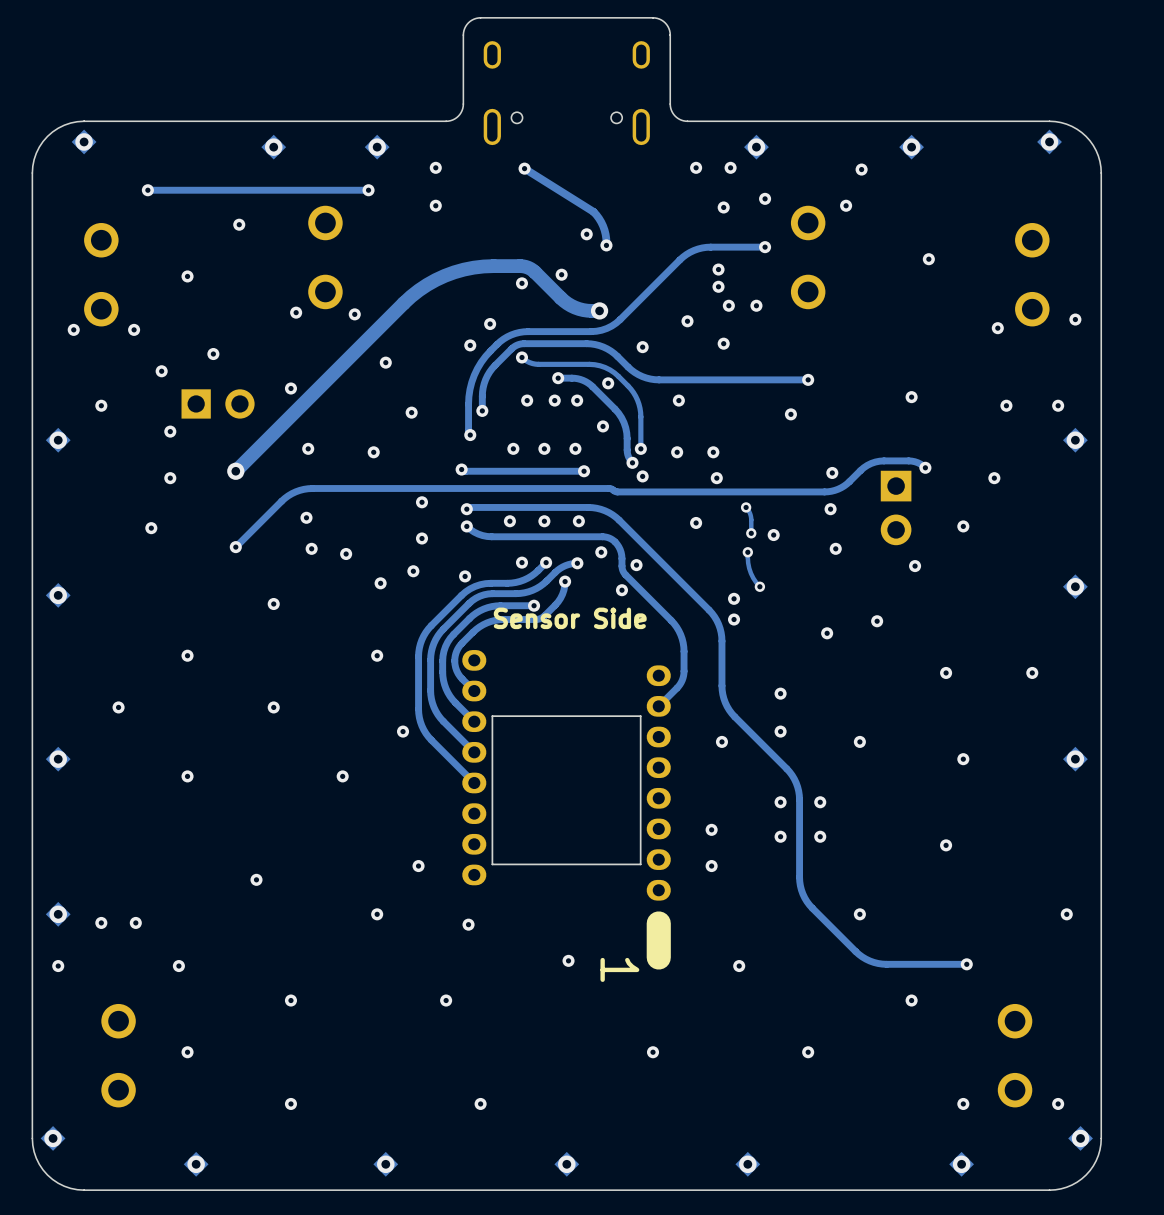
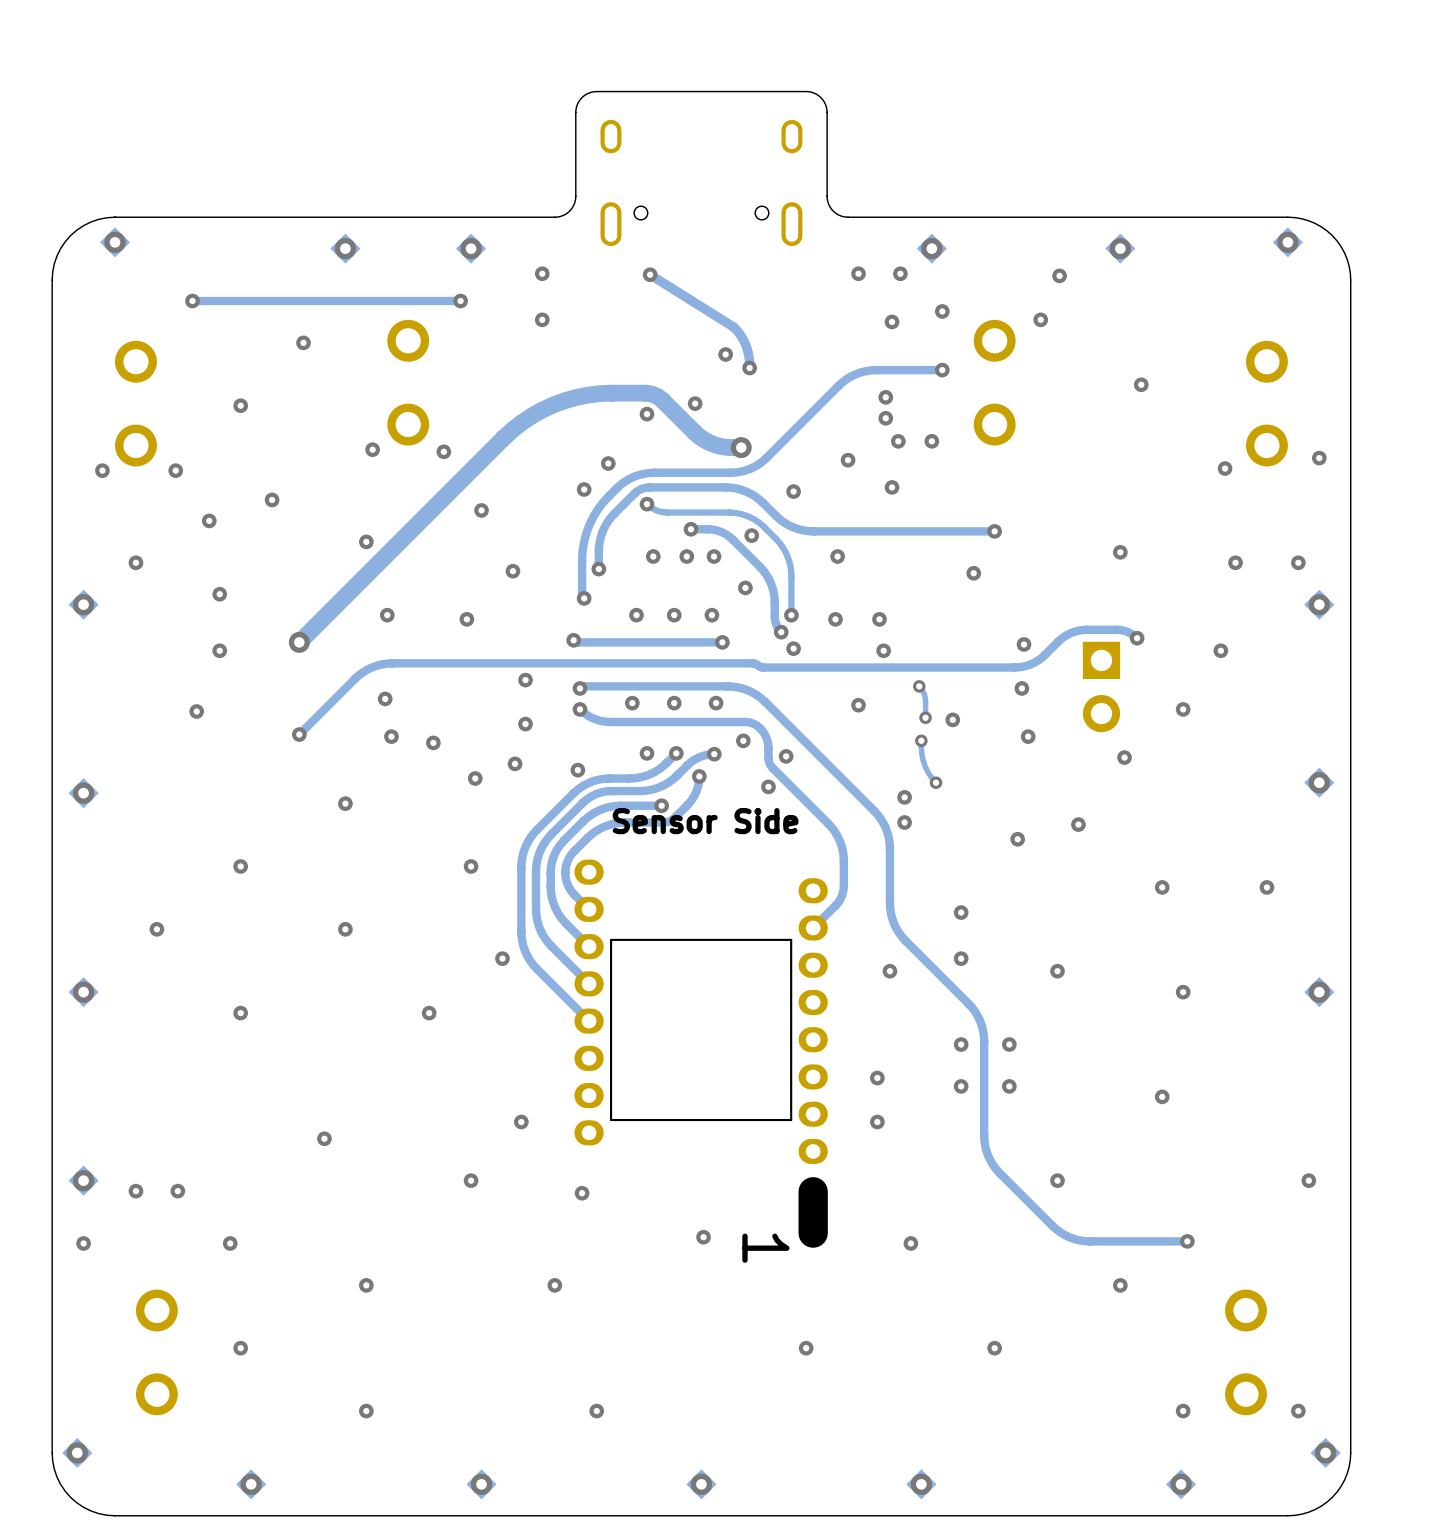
part: (218, 403) -> none

